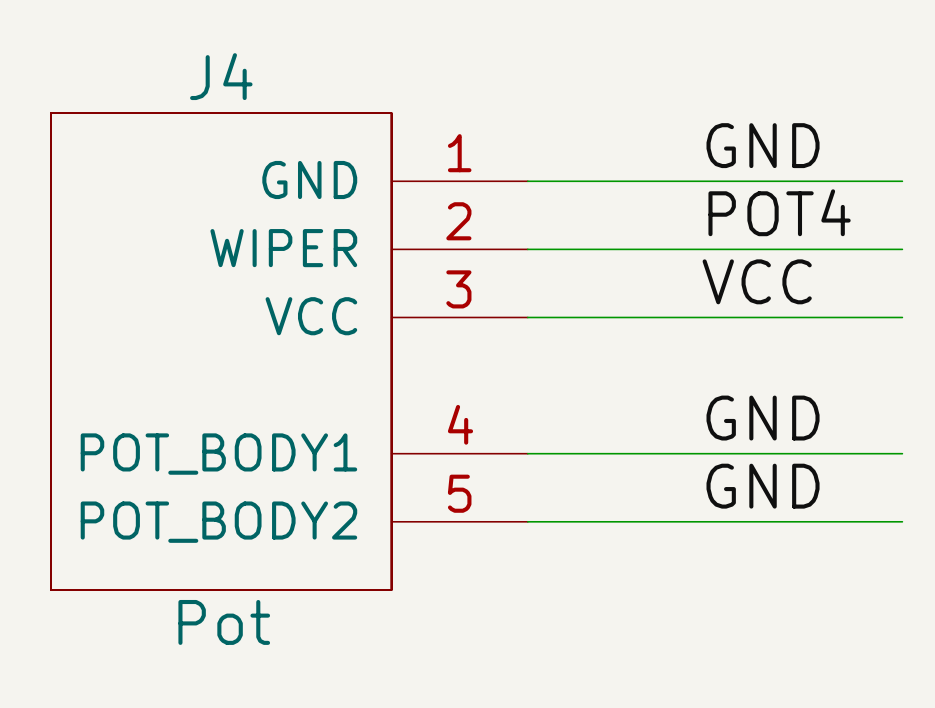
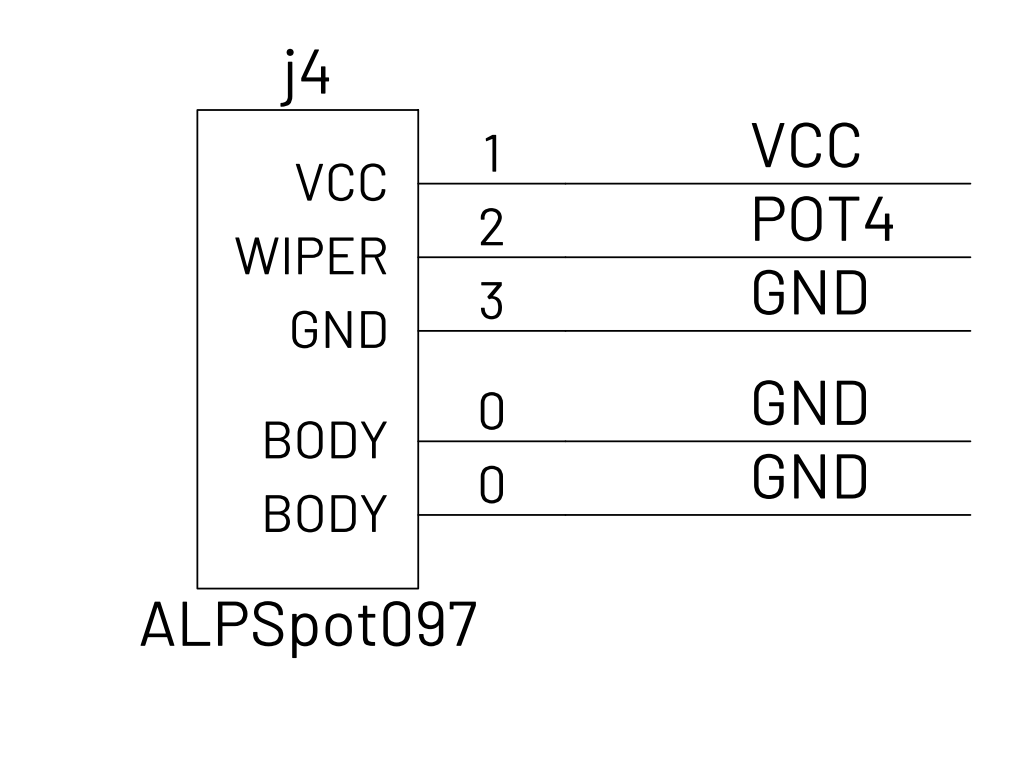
label: GND (763, 145) -> VCC (805, 145)
label: VCC (757, 281) -> GND (810, 292)
j4: none -> ALPSpot097 (381, 349)
J4: Pot (289, 351) -> none
label: none -> GND (810, 402)
label: GND (763, 418) -> none
label: none -> GND (810, 476)
wire: (527, 453) (902, 453) -> (565, 441) (970, 441)
label: GND (763, 486) -> none
wire: (527, 521) (902, 521) -> (565, 514) (970, 514)

